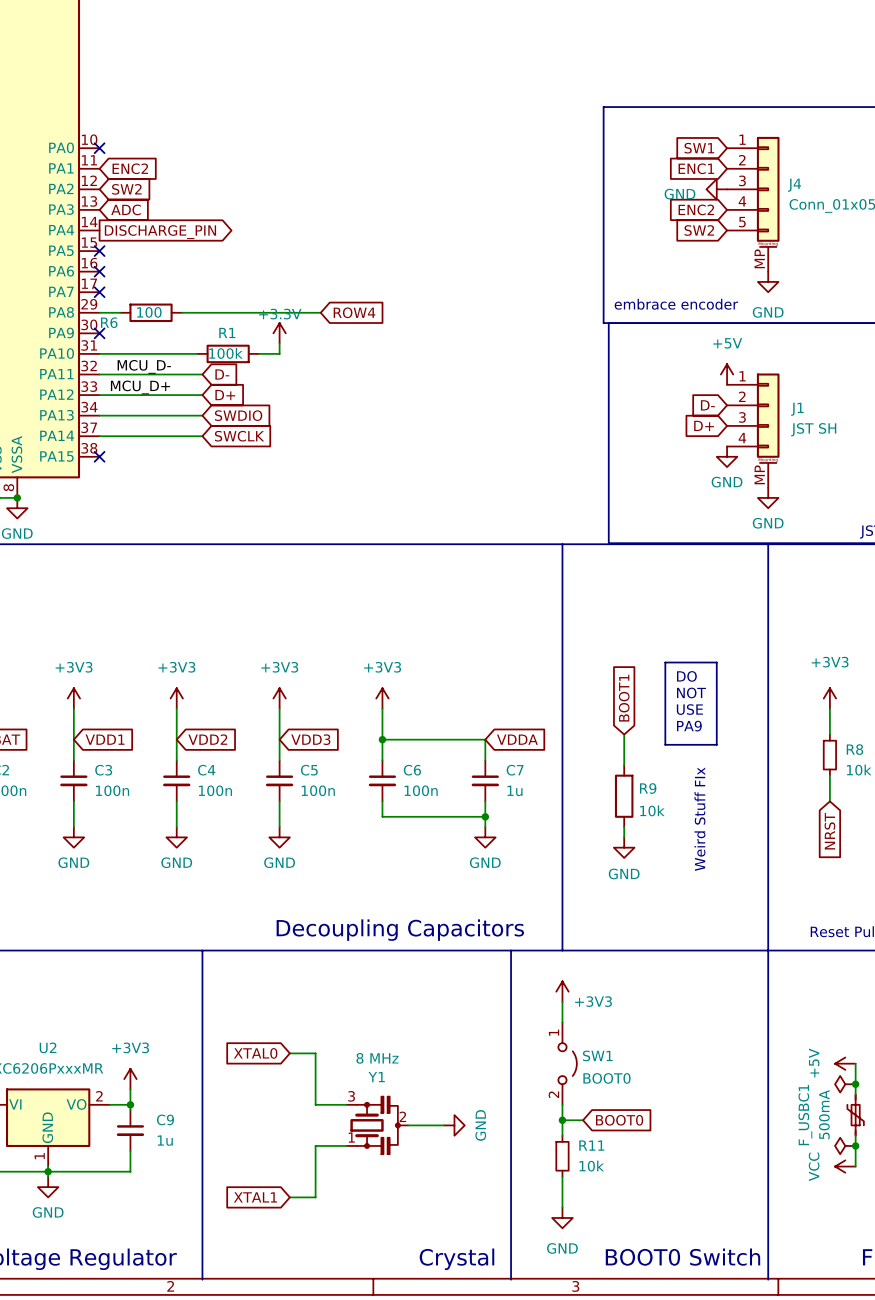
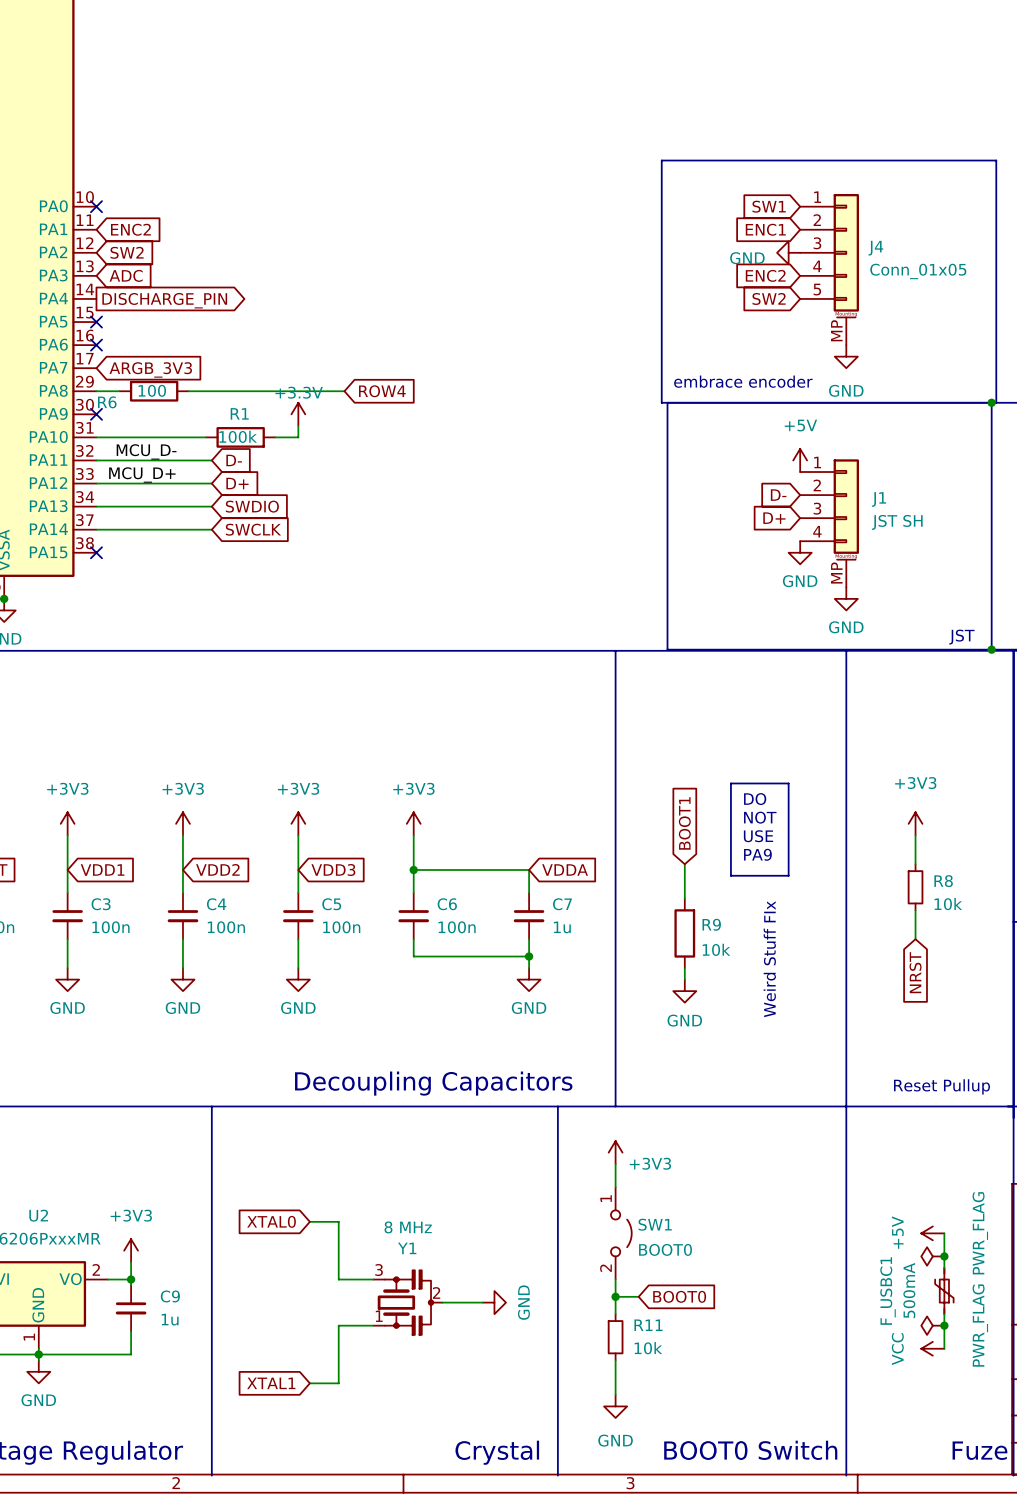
no-connect mark: (99, 292) -> none
global label: none -> ARGB_3V3 (150, 369)

